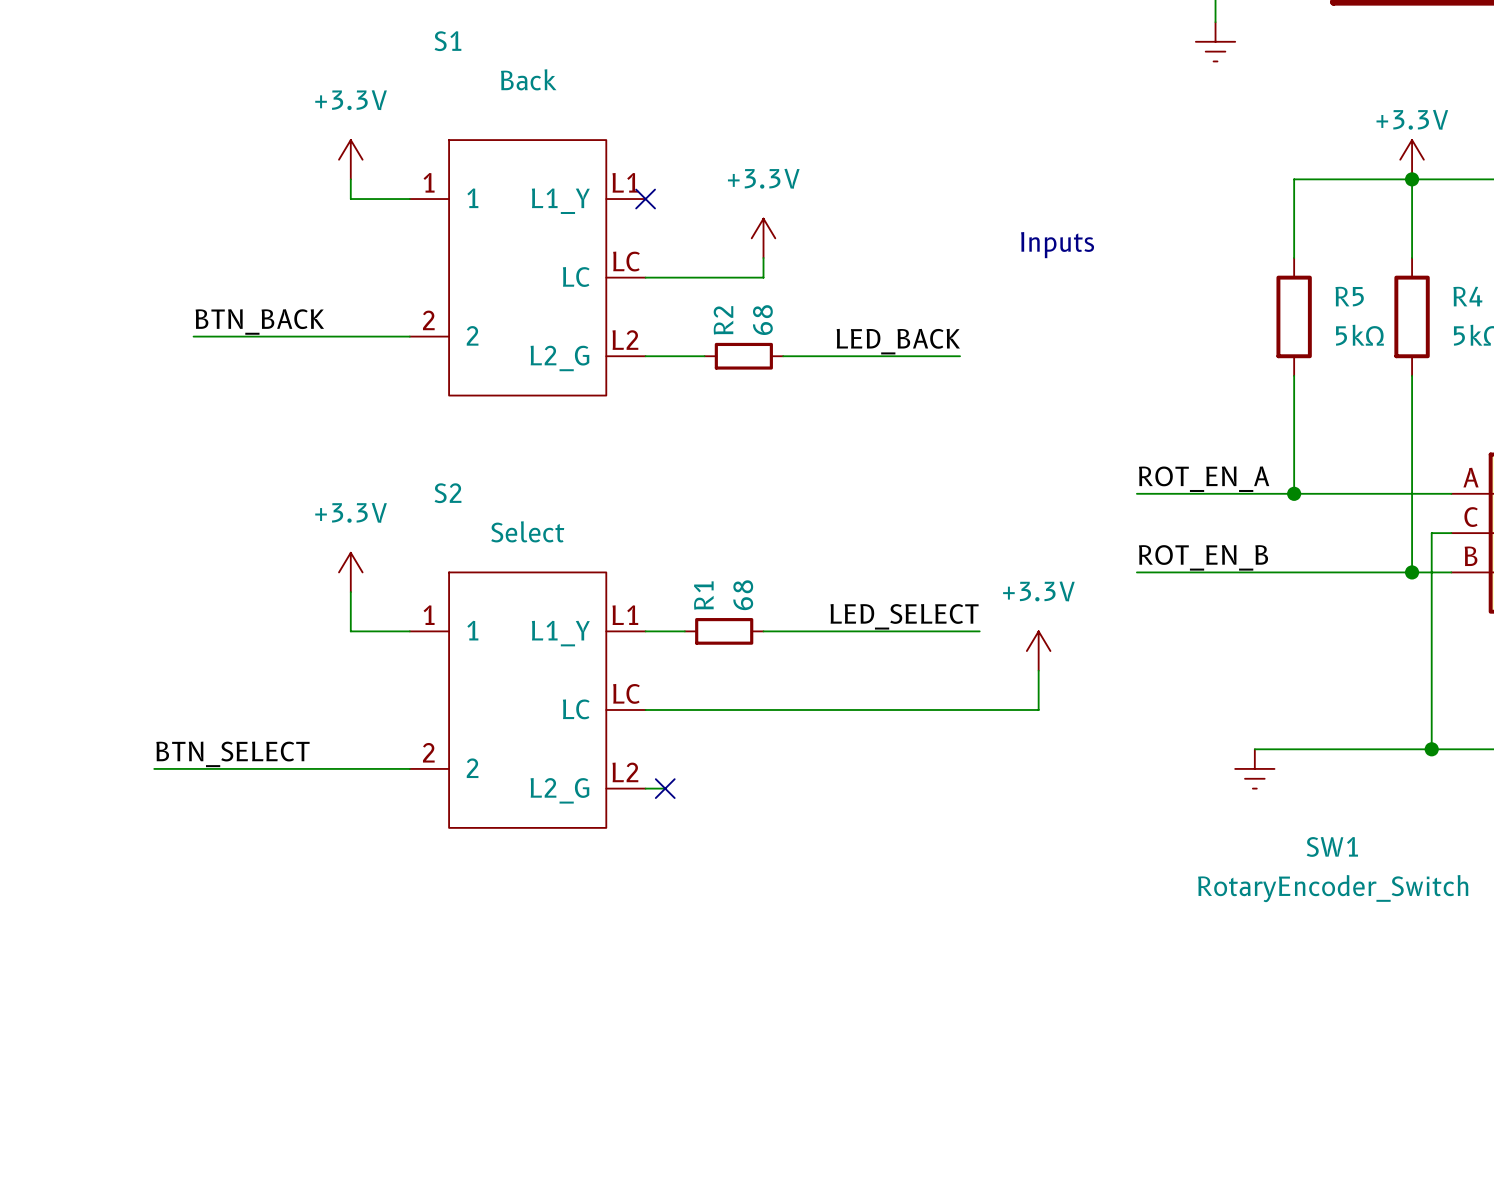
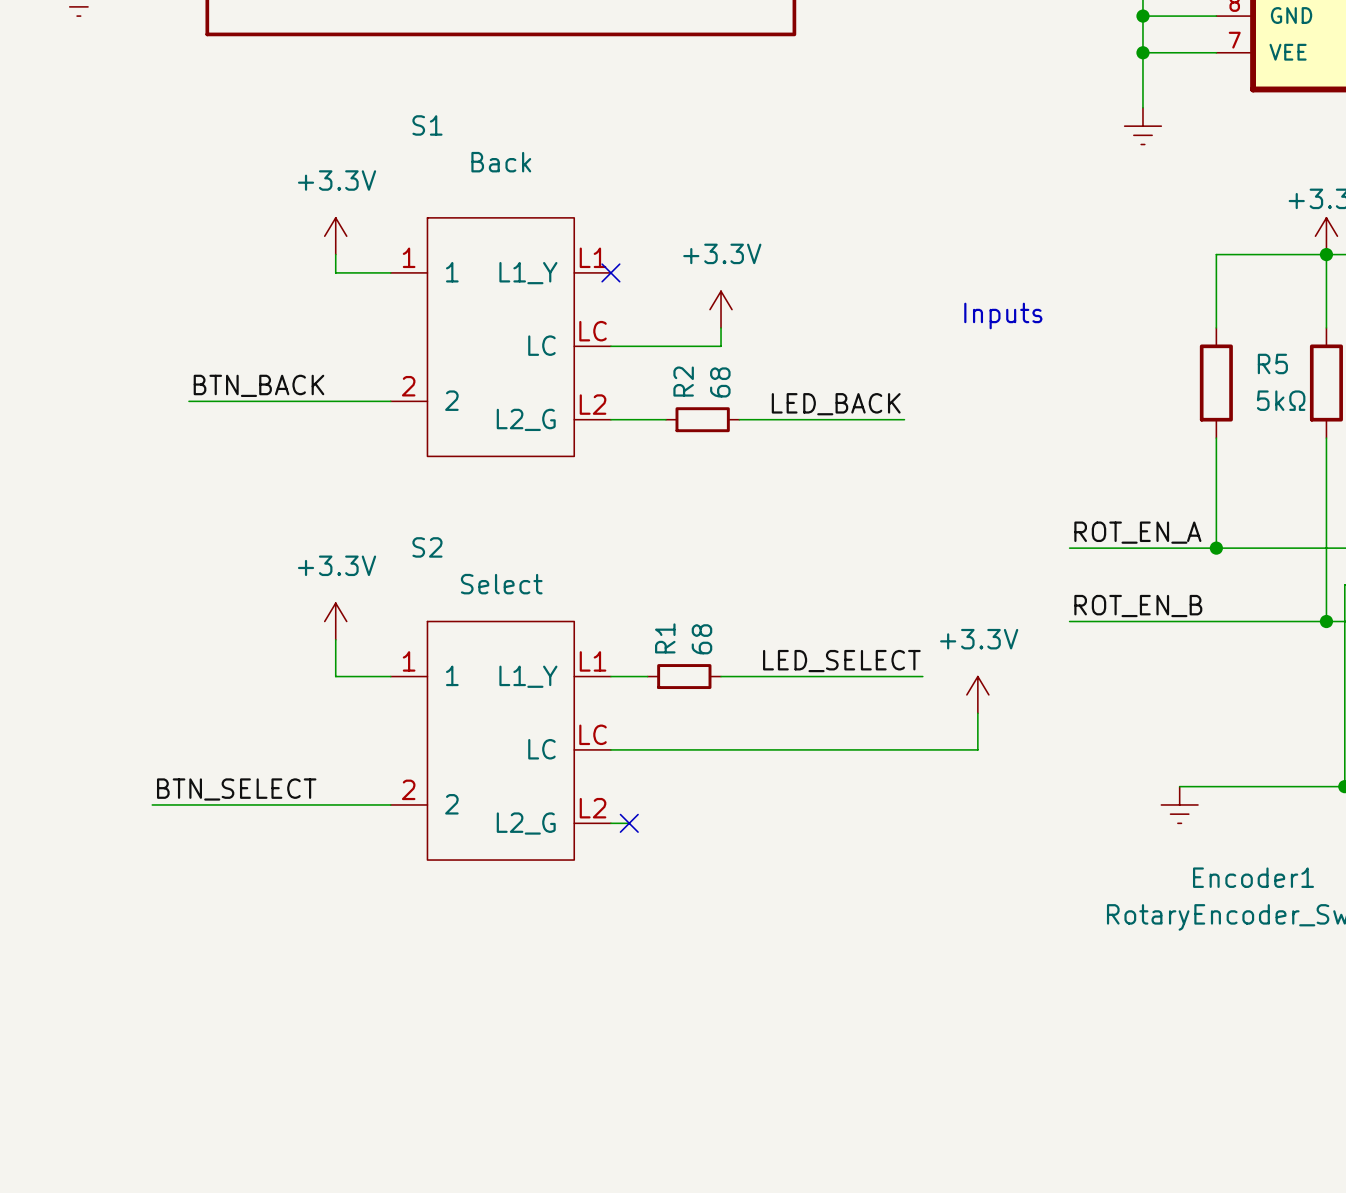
SW1 name: SW1 (1332, 846) -> Encoder1 (1253, 877)

